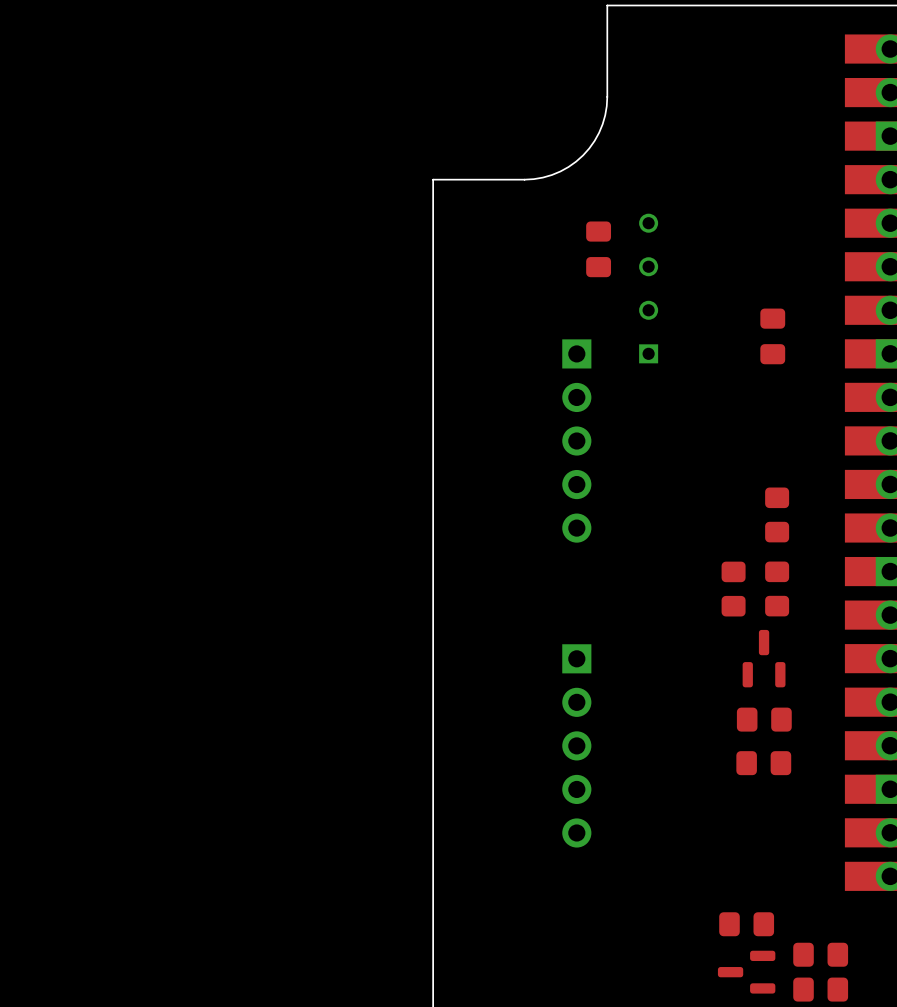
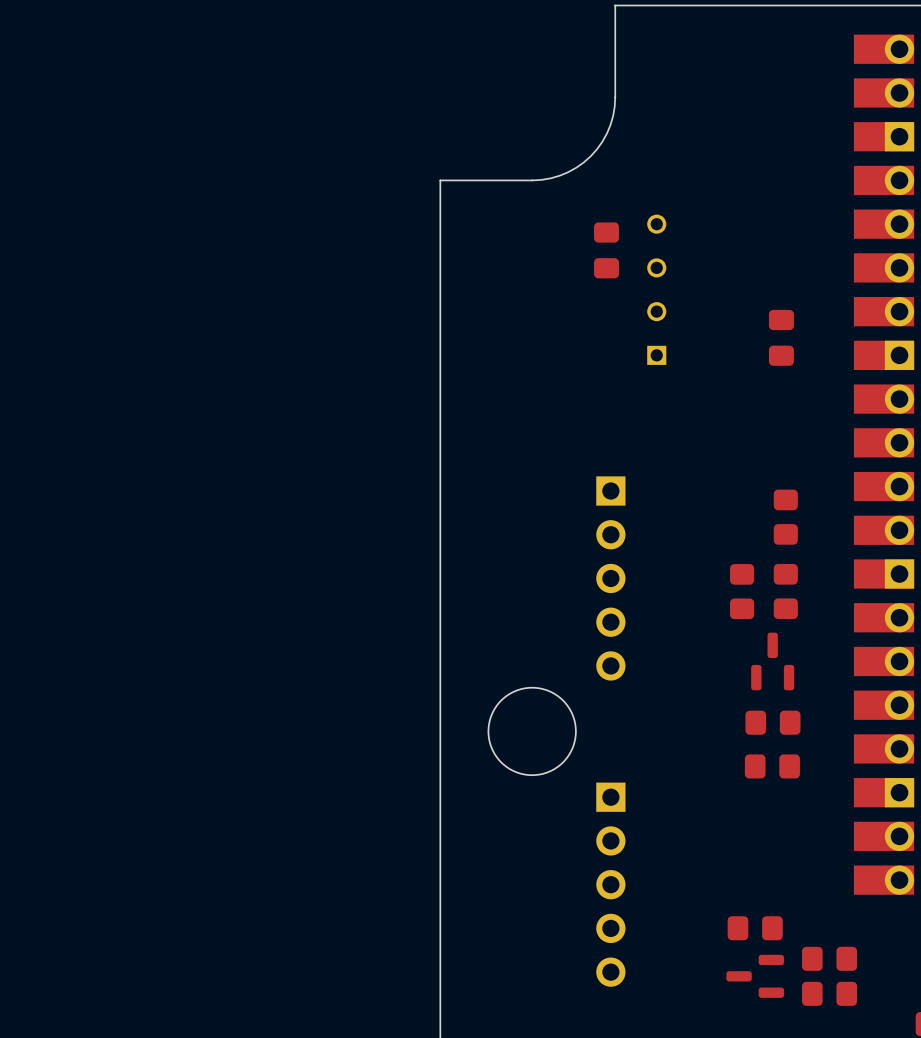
part: (576, 441) -> none
part: none -> (610, 578)
round board edge: none -> [487, 686, 577, 777]
part: (576, 745) -> none
part: none -> (610, 884)

